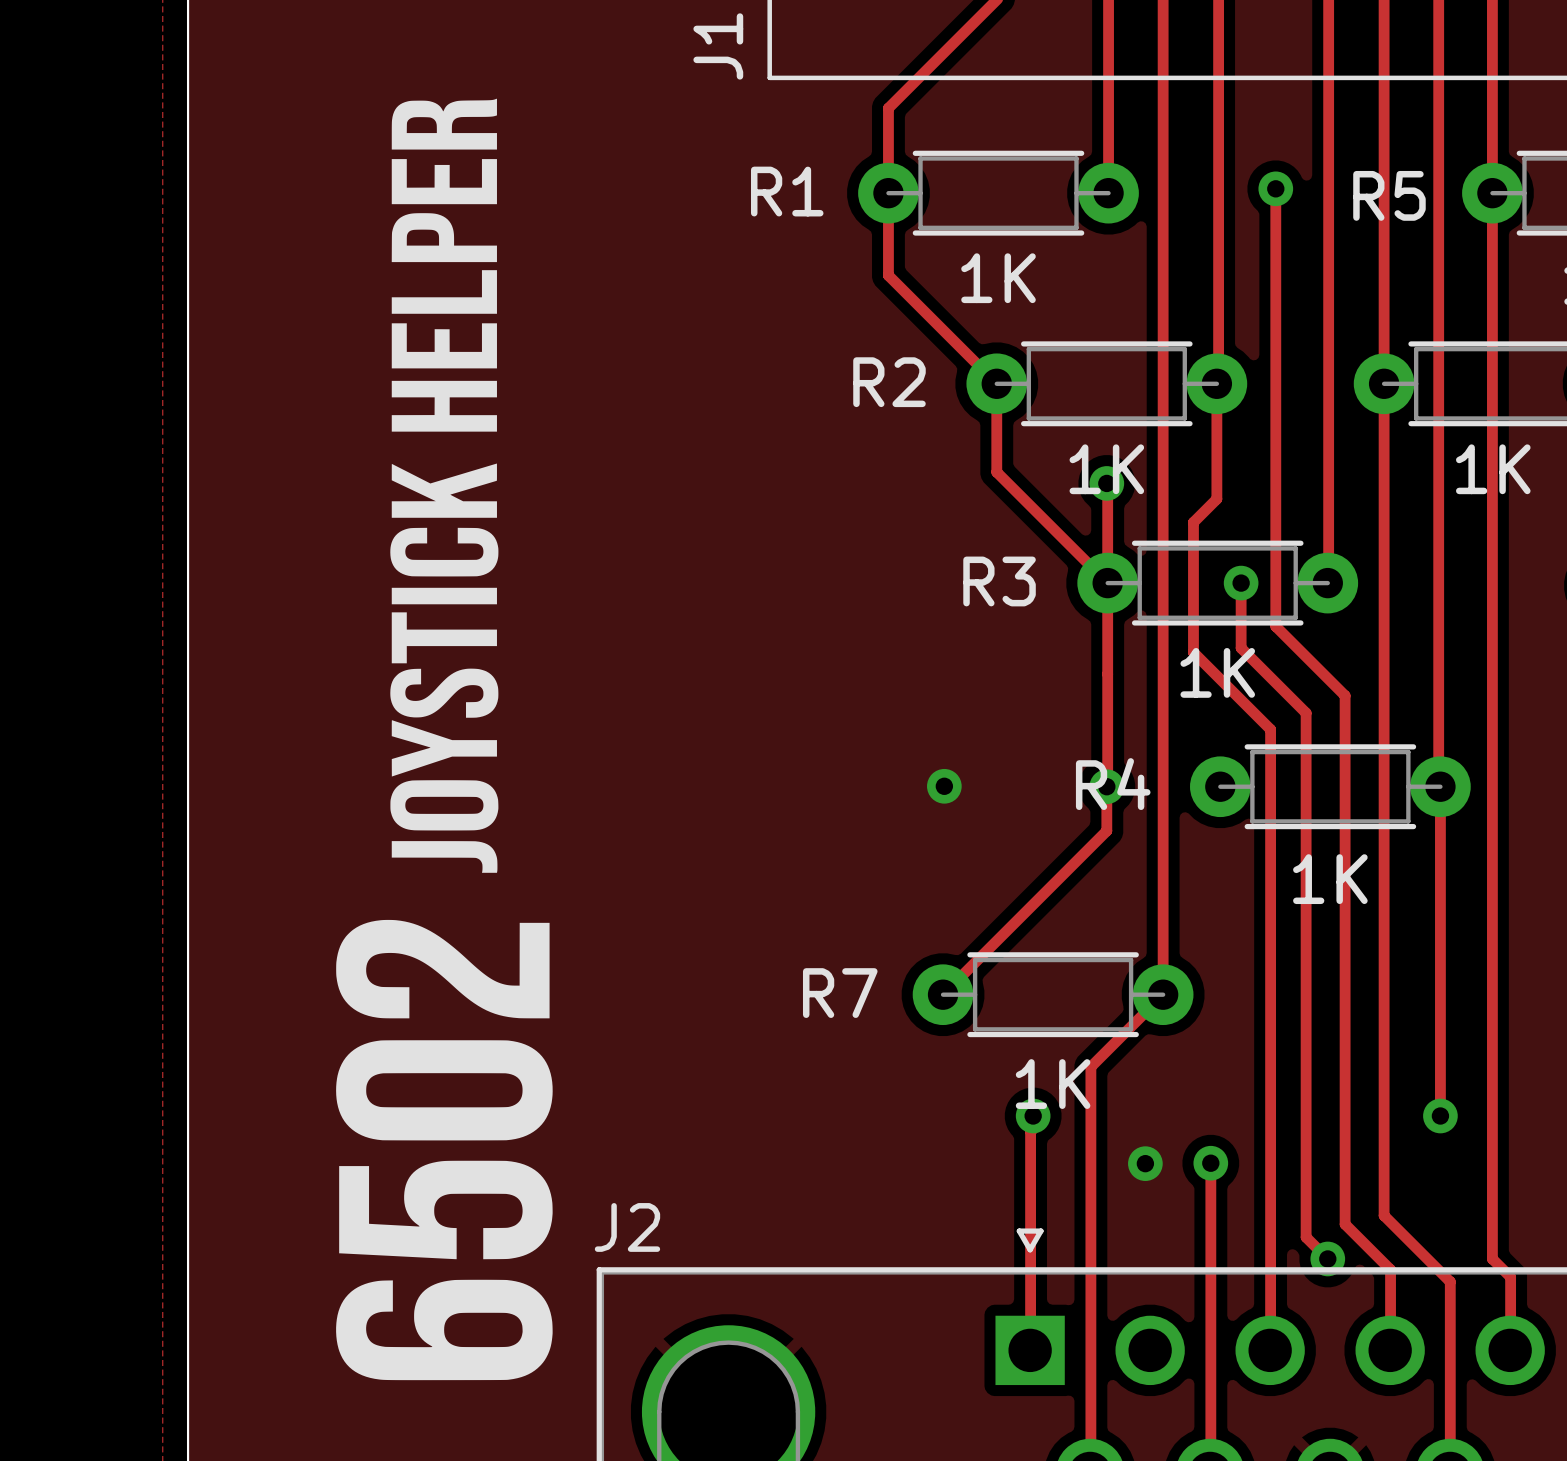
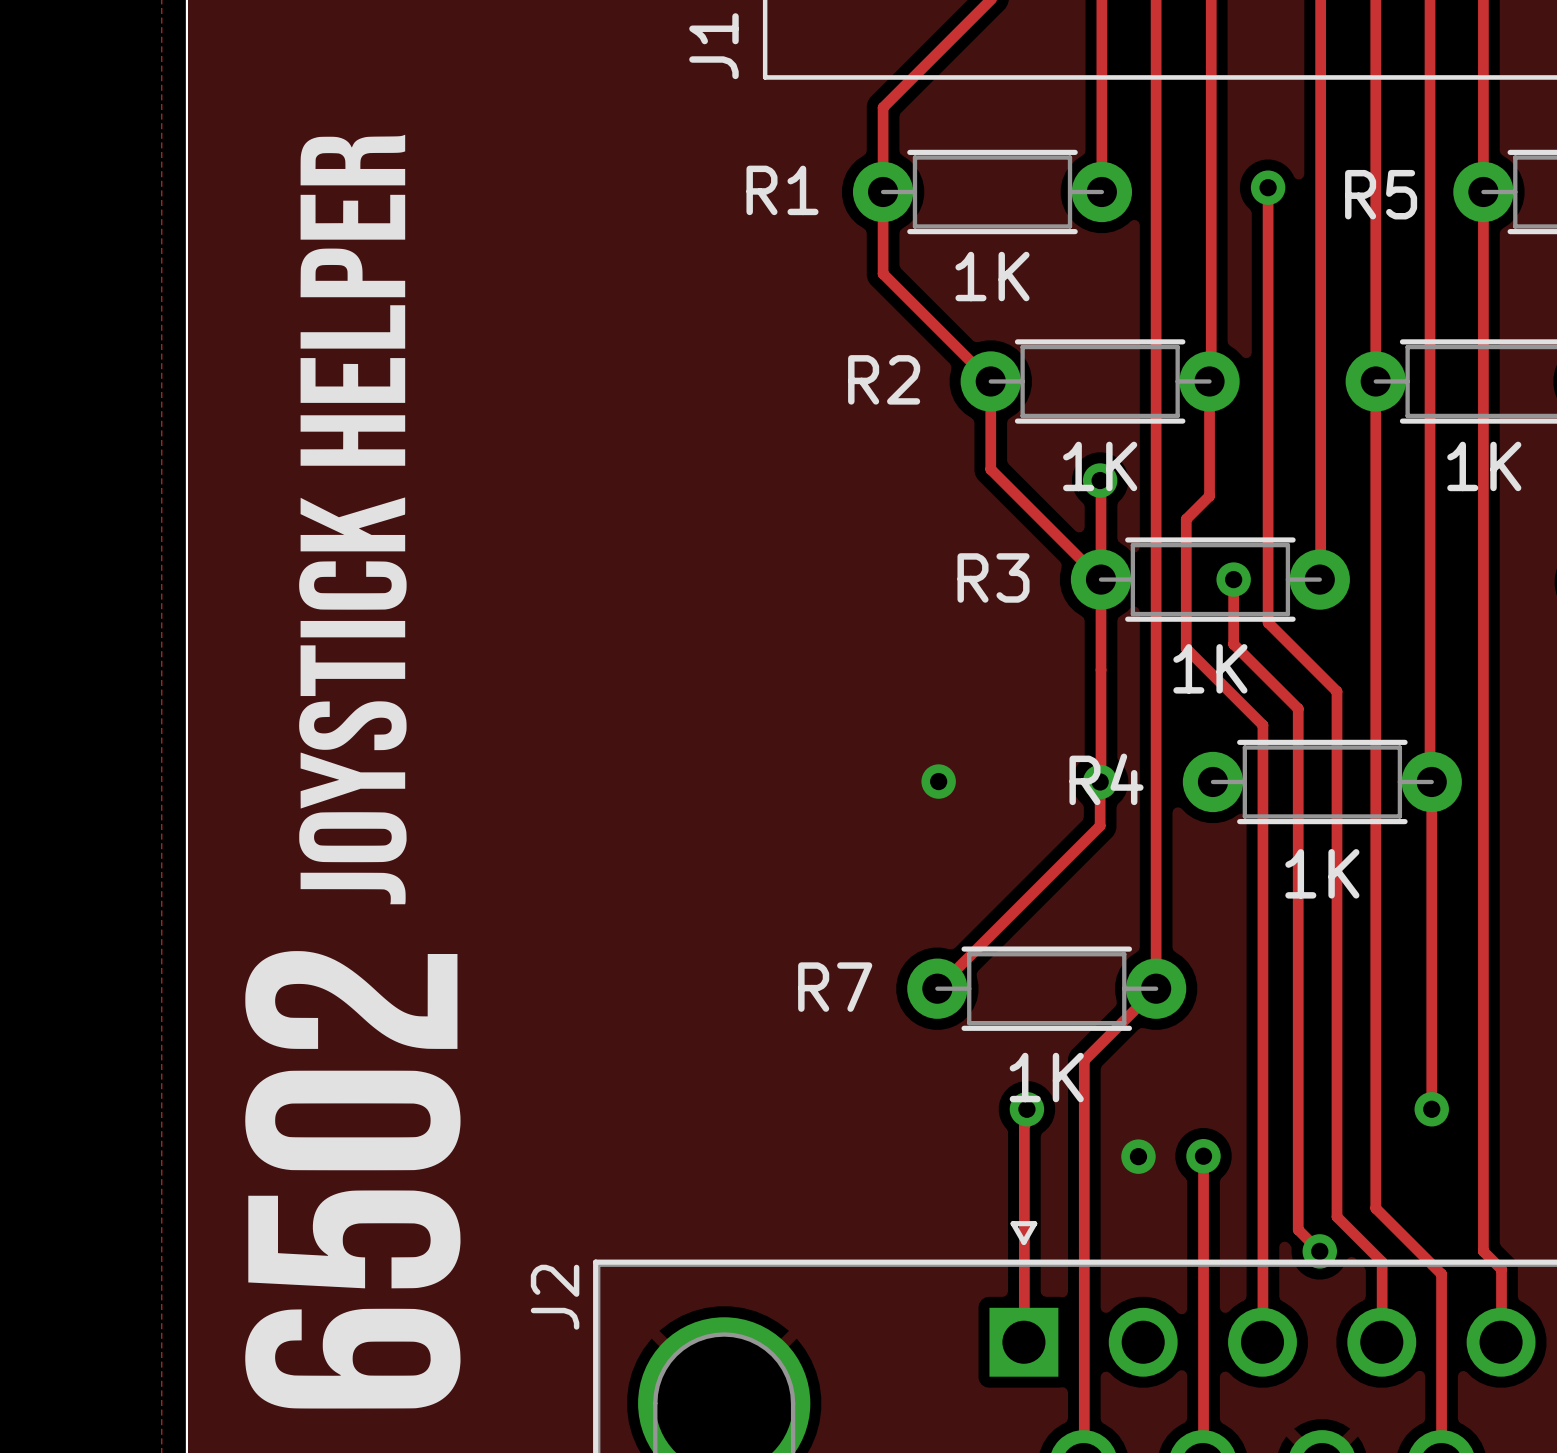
drawing position: (444, 739) -> (352, 771)
J2 name rotation: 0° (627, 1227) -> 90° counterclockwise (555, 1297)
J2 name position: J2 (627, 1227) -> J2 (555, 1297)

